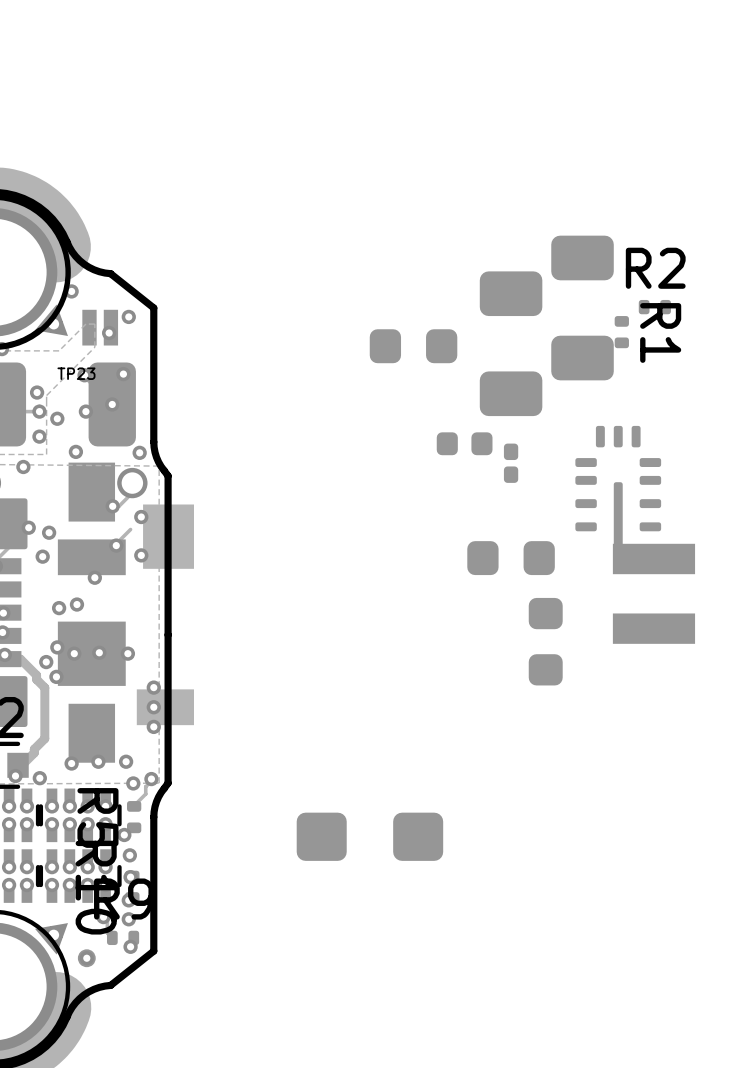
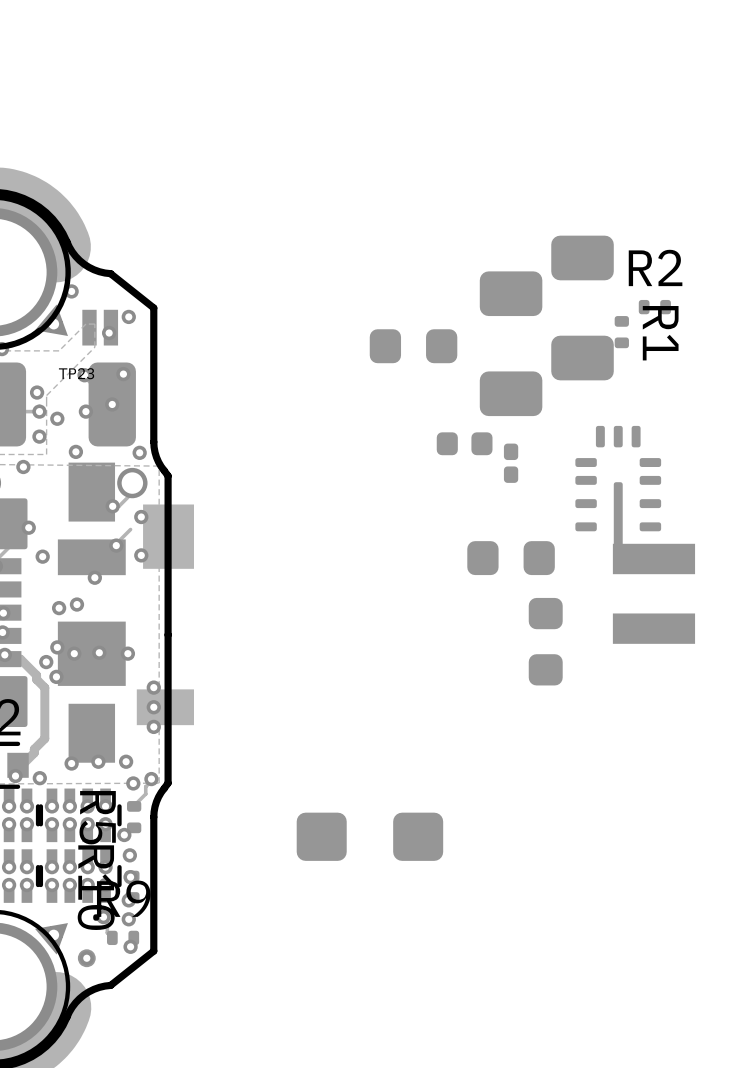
via: (49, 532) -> none

